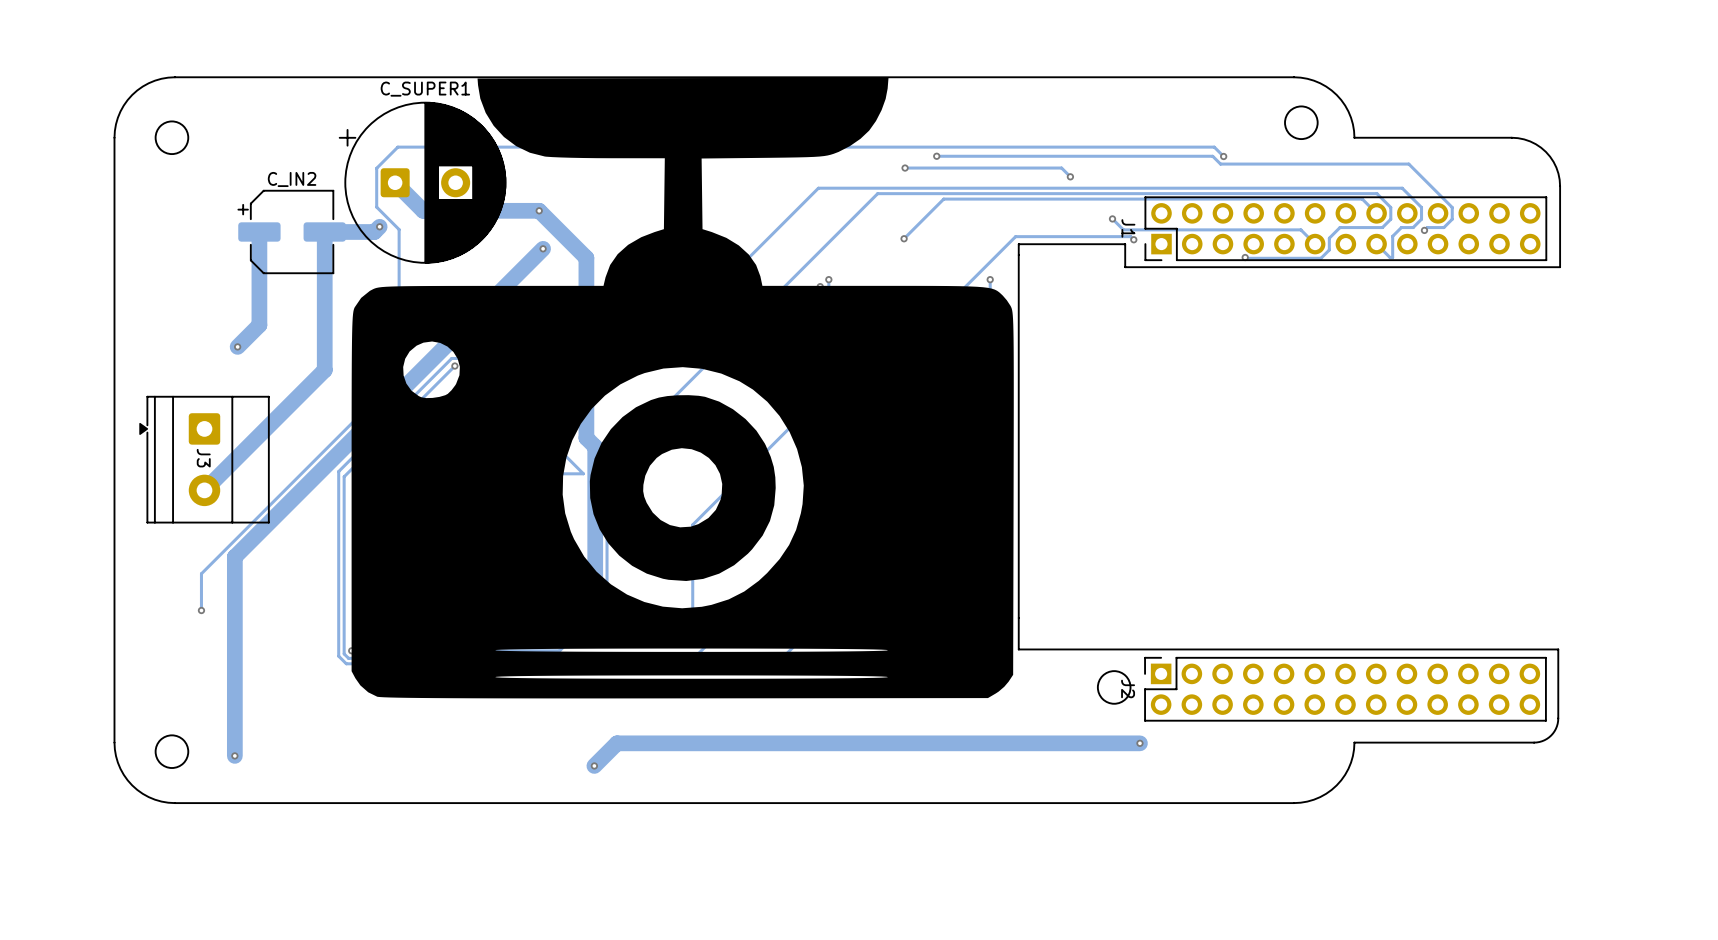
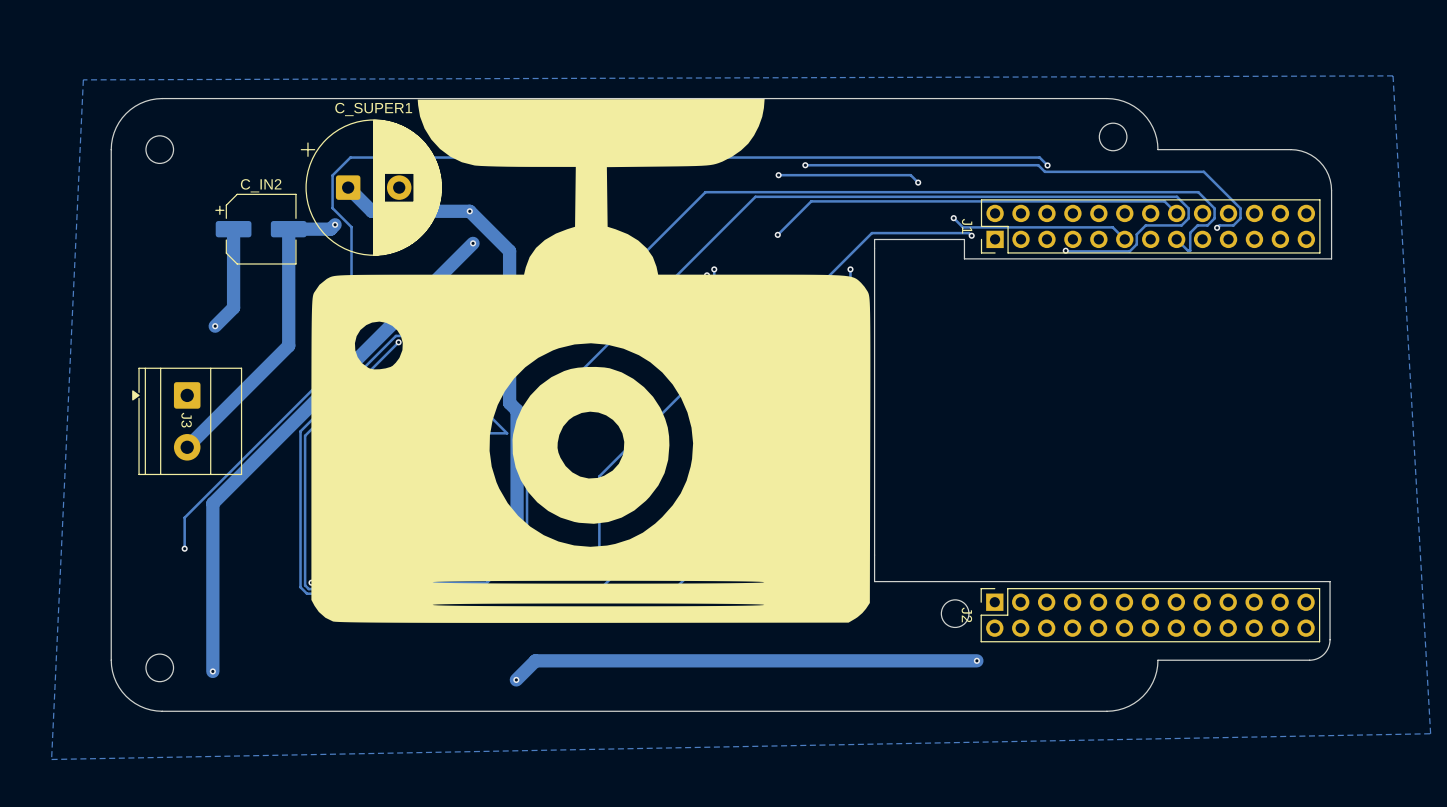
zone outline: none -> (1393, 75) (1430, 733) (51, 759) (83, 79) (1393, 75)

